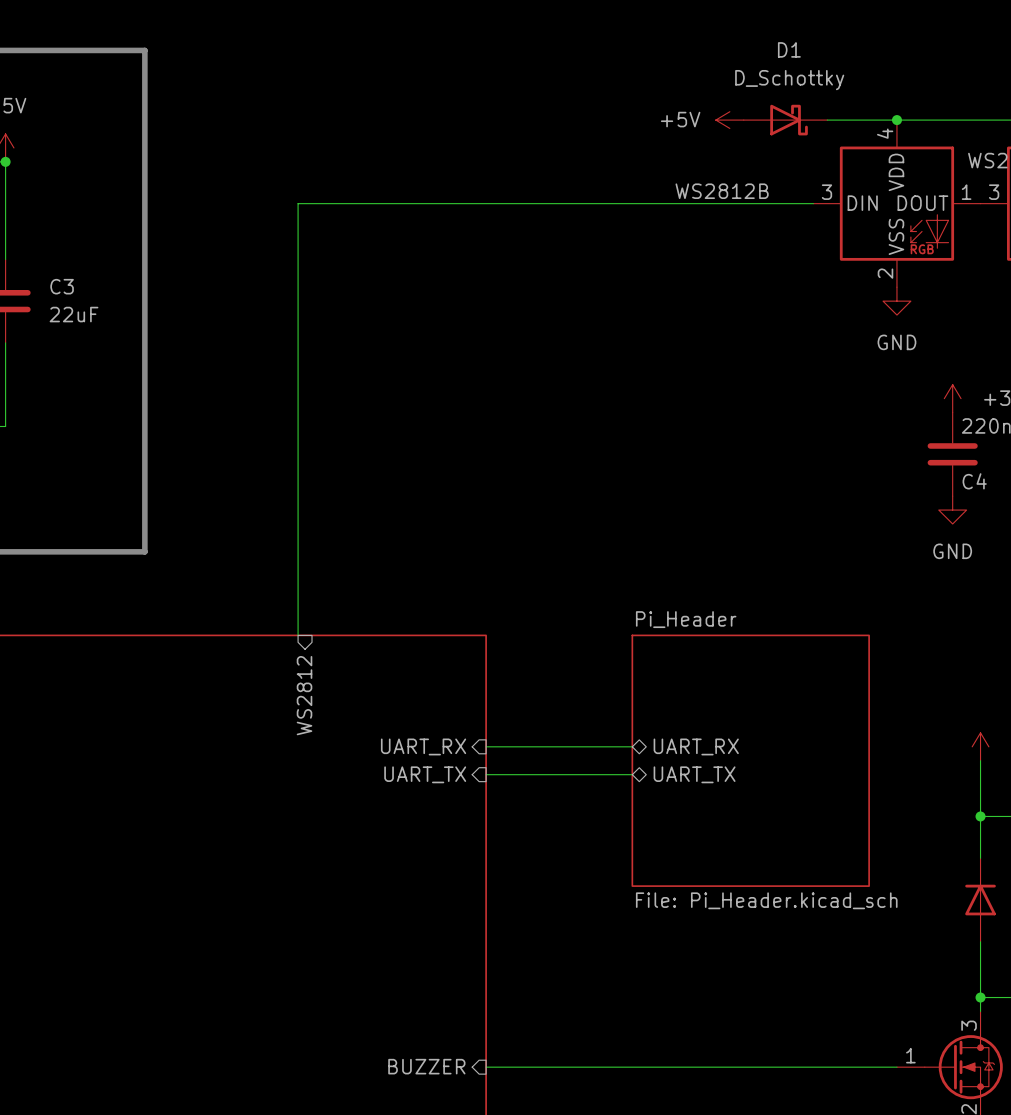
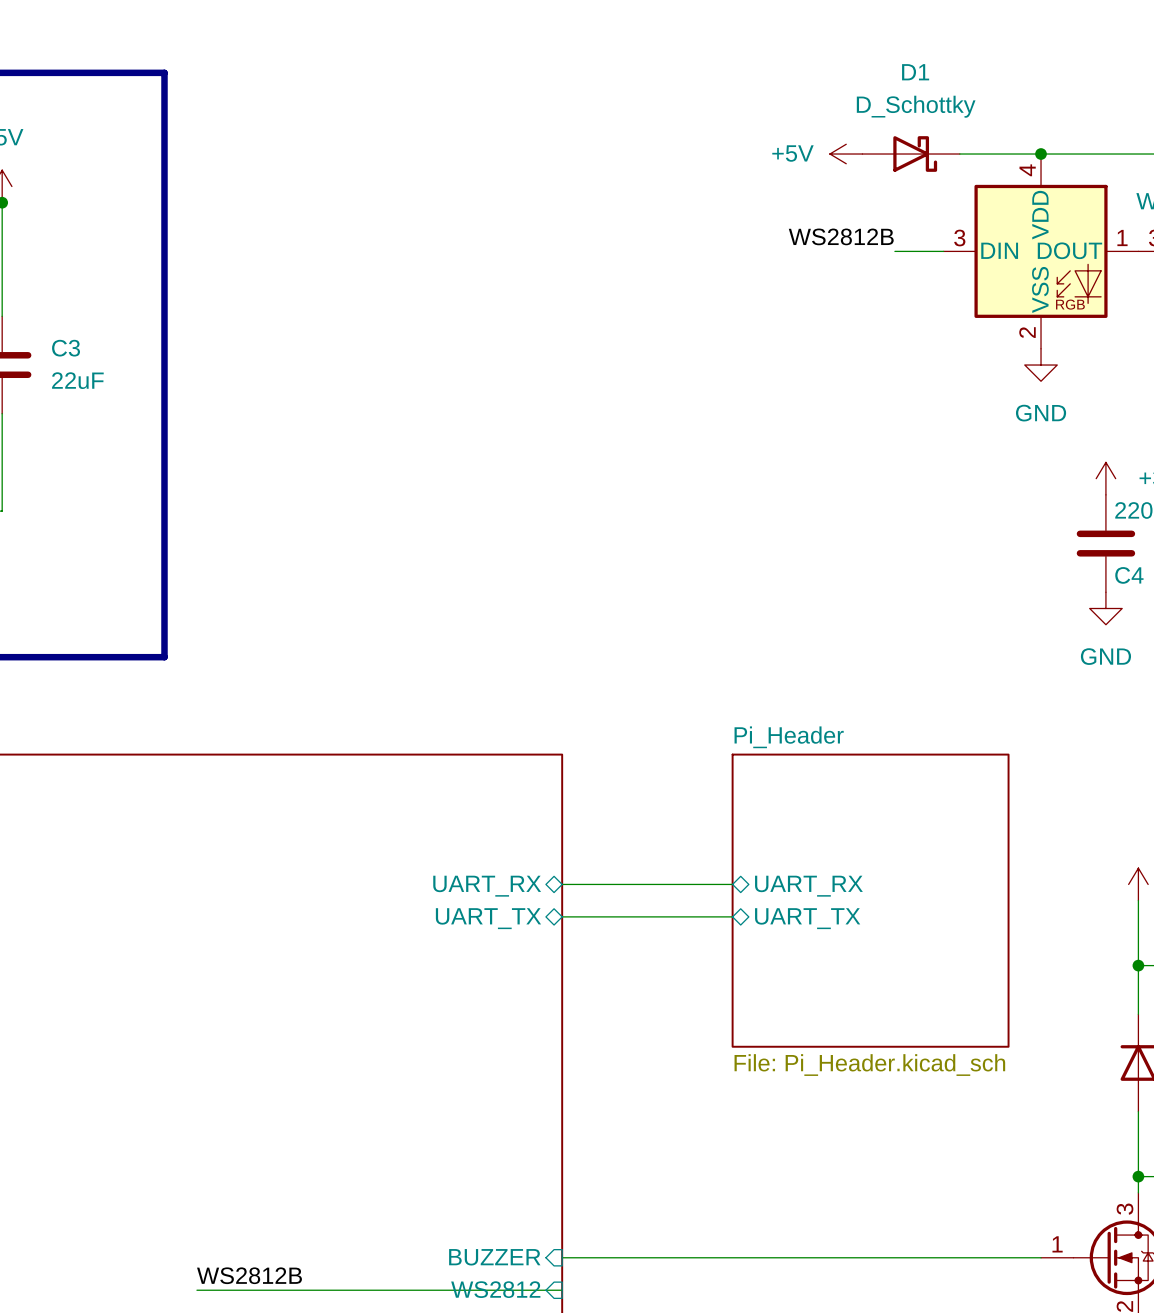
wire: (771, 203) (298, 203) (298, 635) -> none
sheet pin: WS2812 (304, 695) -> none
sheet pin shape: input (423, 746) -> bidirectional (487, 886)
sheet pin shape: input (425, 774) -> bidirectional (488, 918)
label: none -> WS2812B (249, 1275)
sheet pin: none -> WS2812 (495, 1289)
wire: none -> (196, 1290) (562, 1290)

